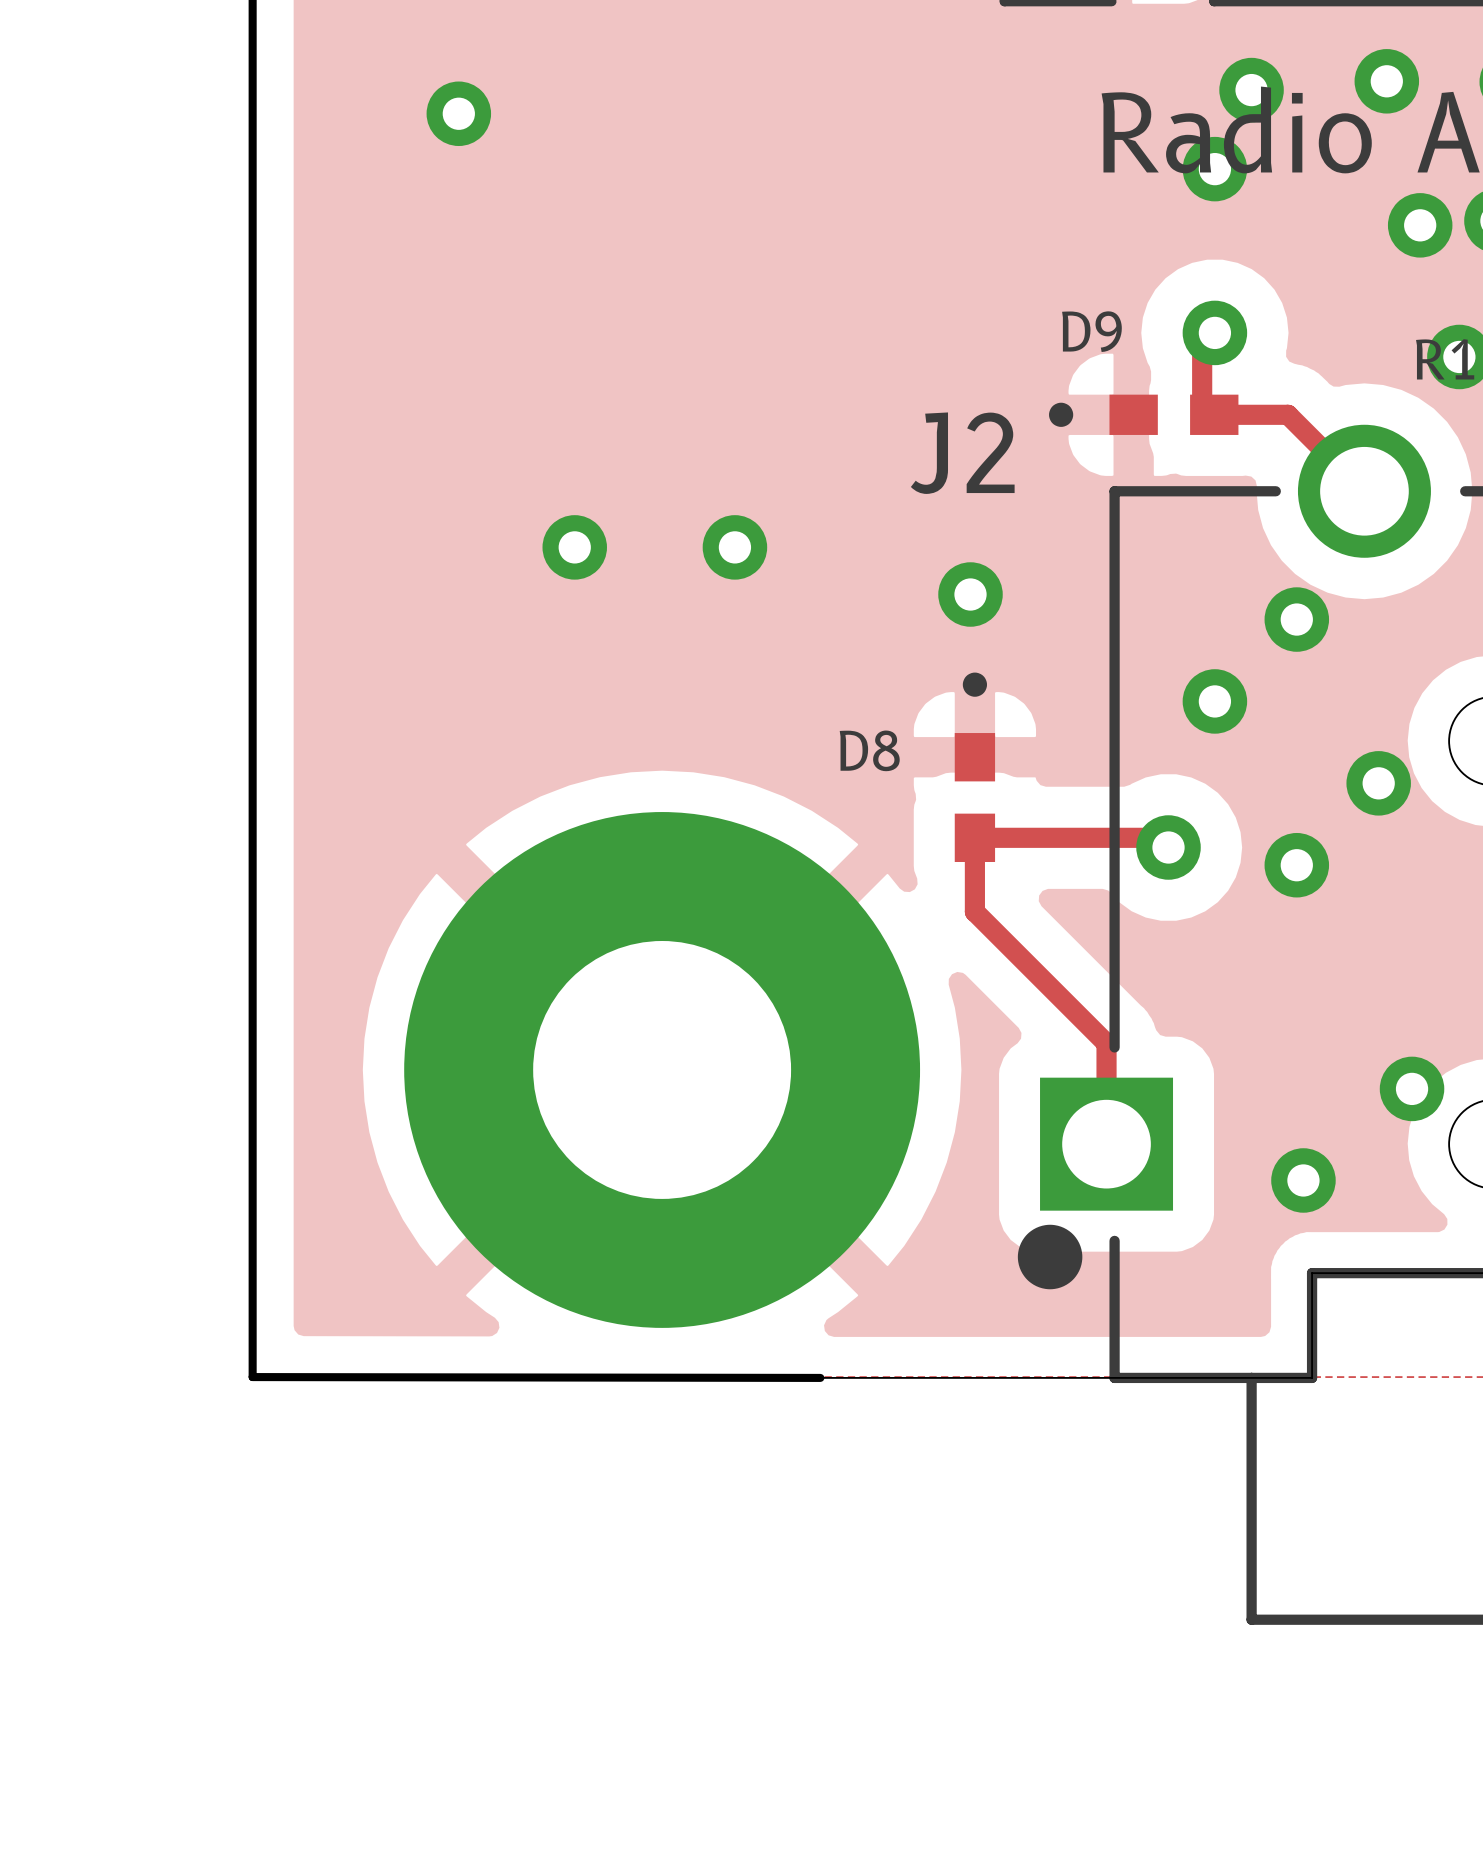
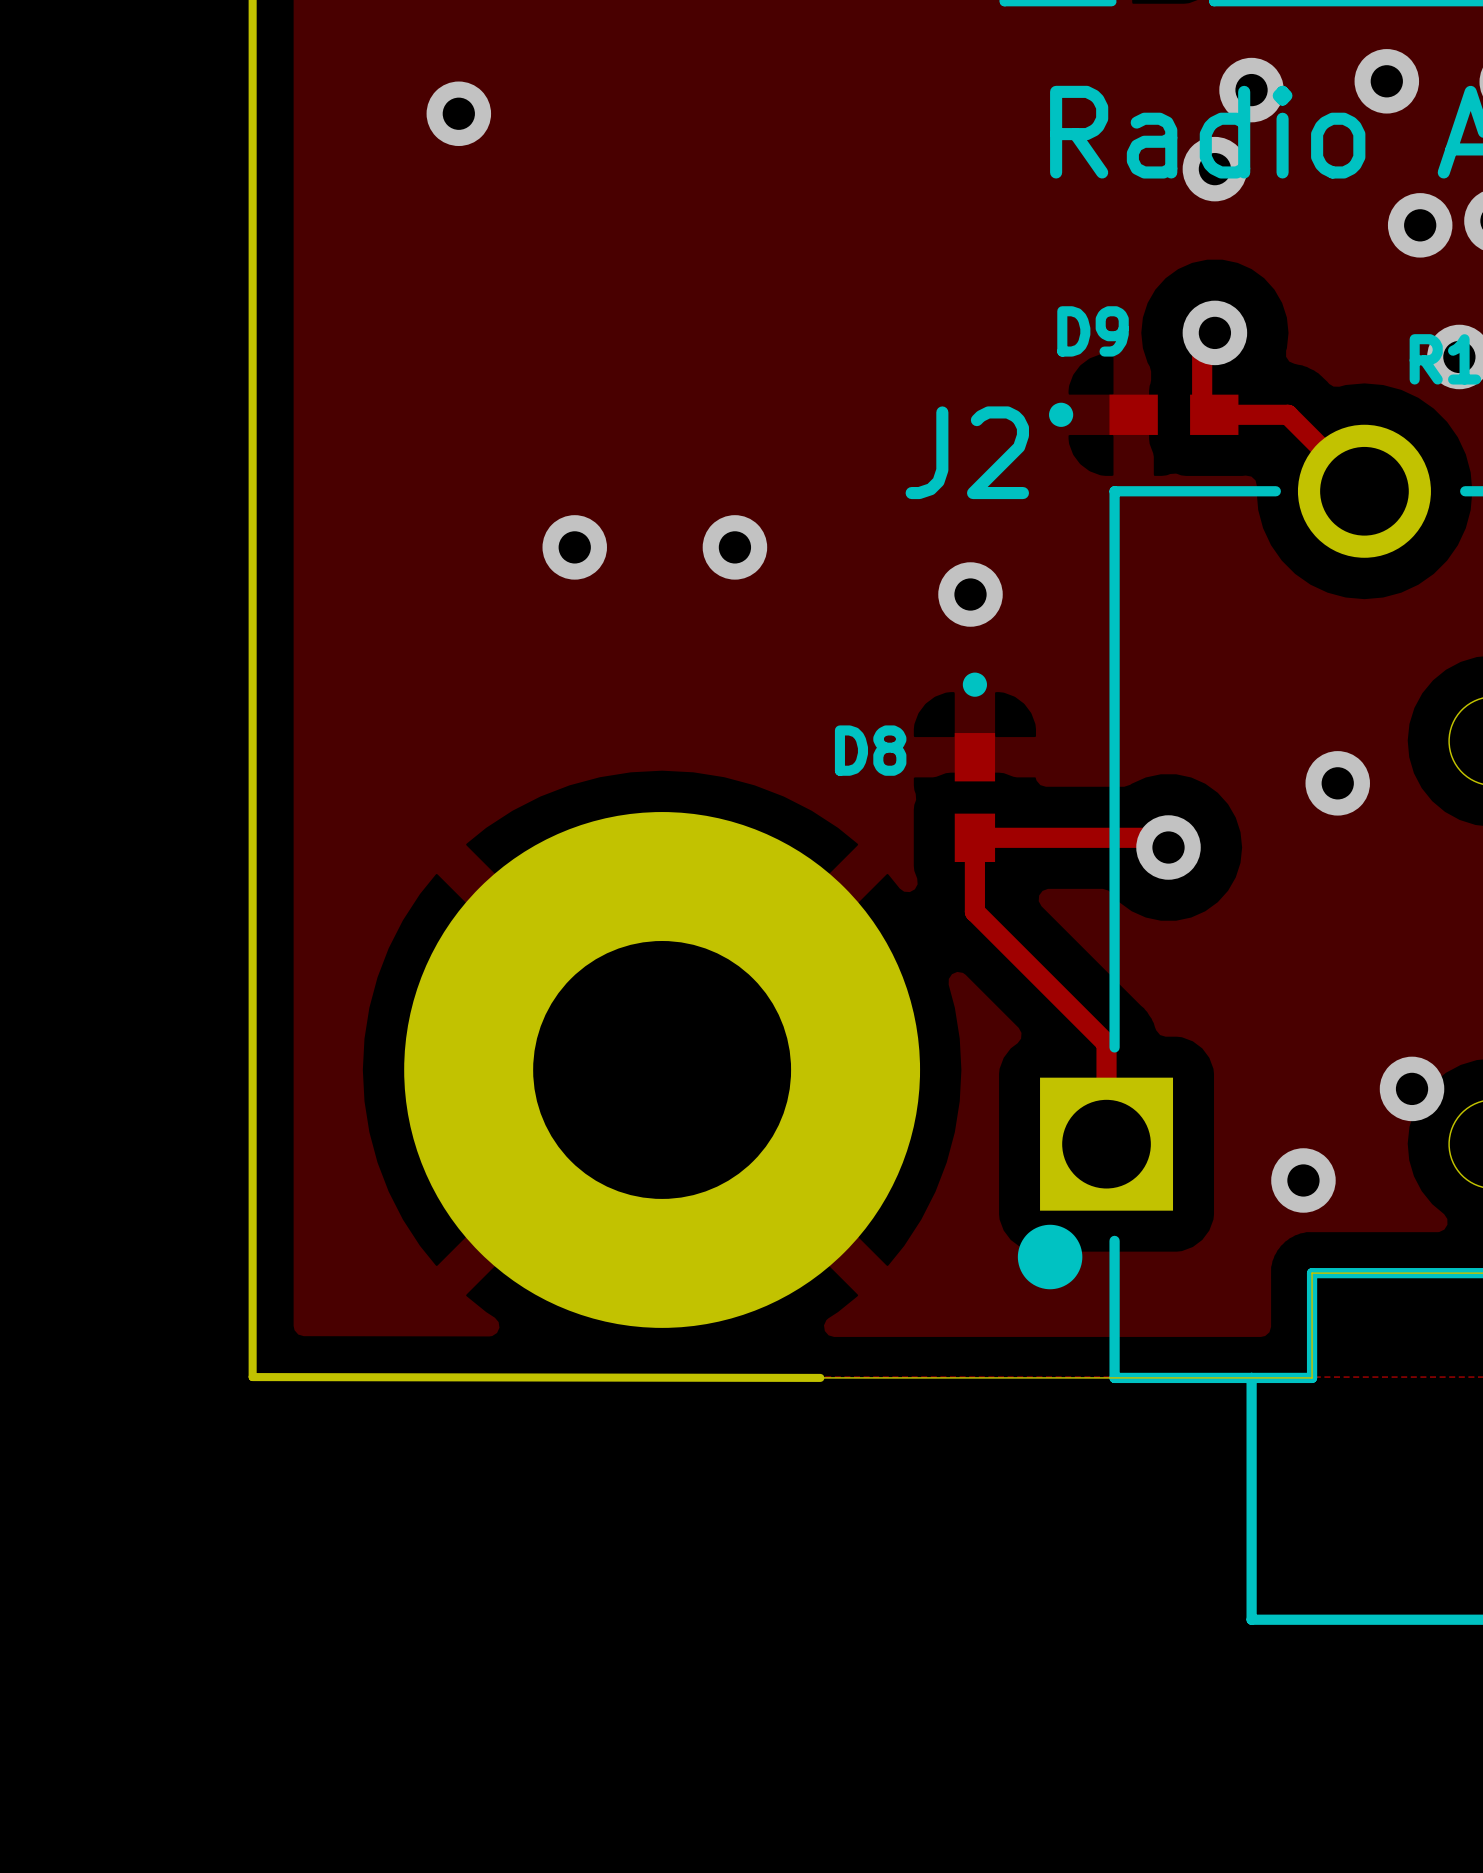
via: (1296, 619) -> none
via: (1214, 701) -> none
via position: (1378, 783) -> (1337, 783)
via: (1296, 865) -> none

